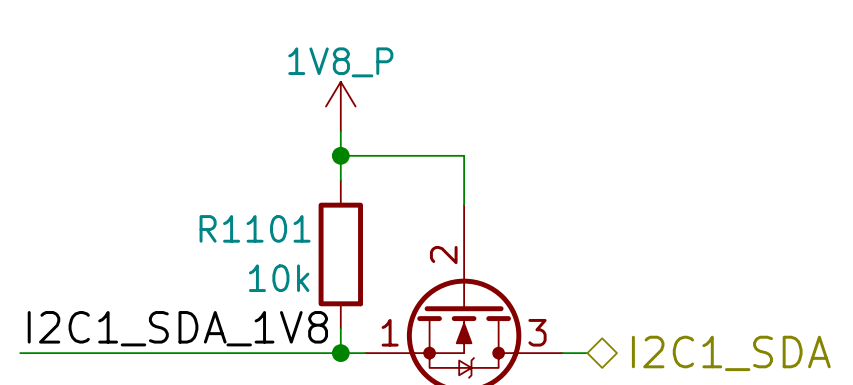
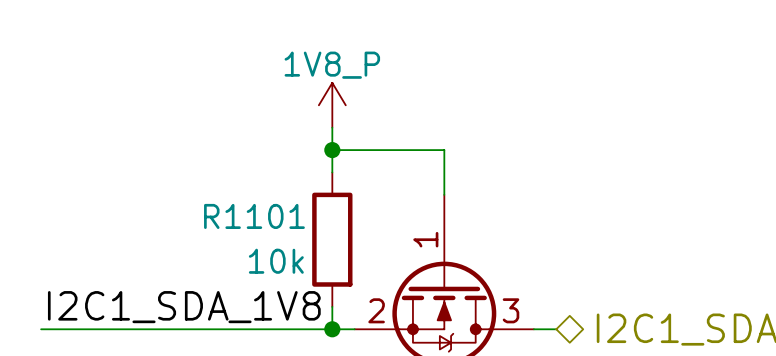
part pin number: 2 (443, 255) -> 1 (425, 239)
part pin number: 1 (390, 332) -> 2 (376, 310)

